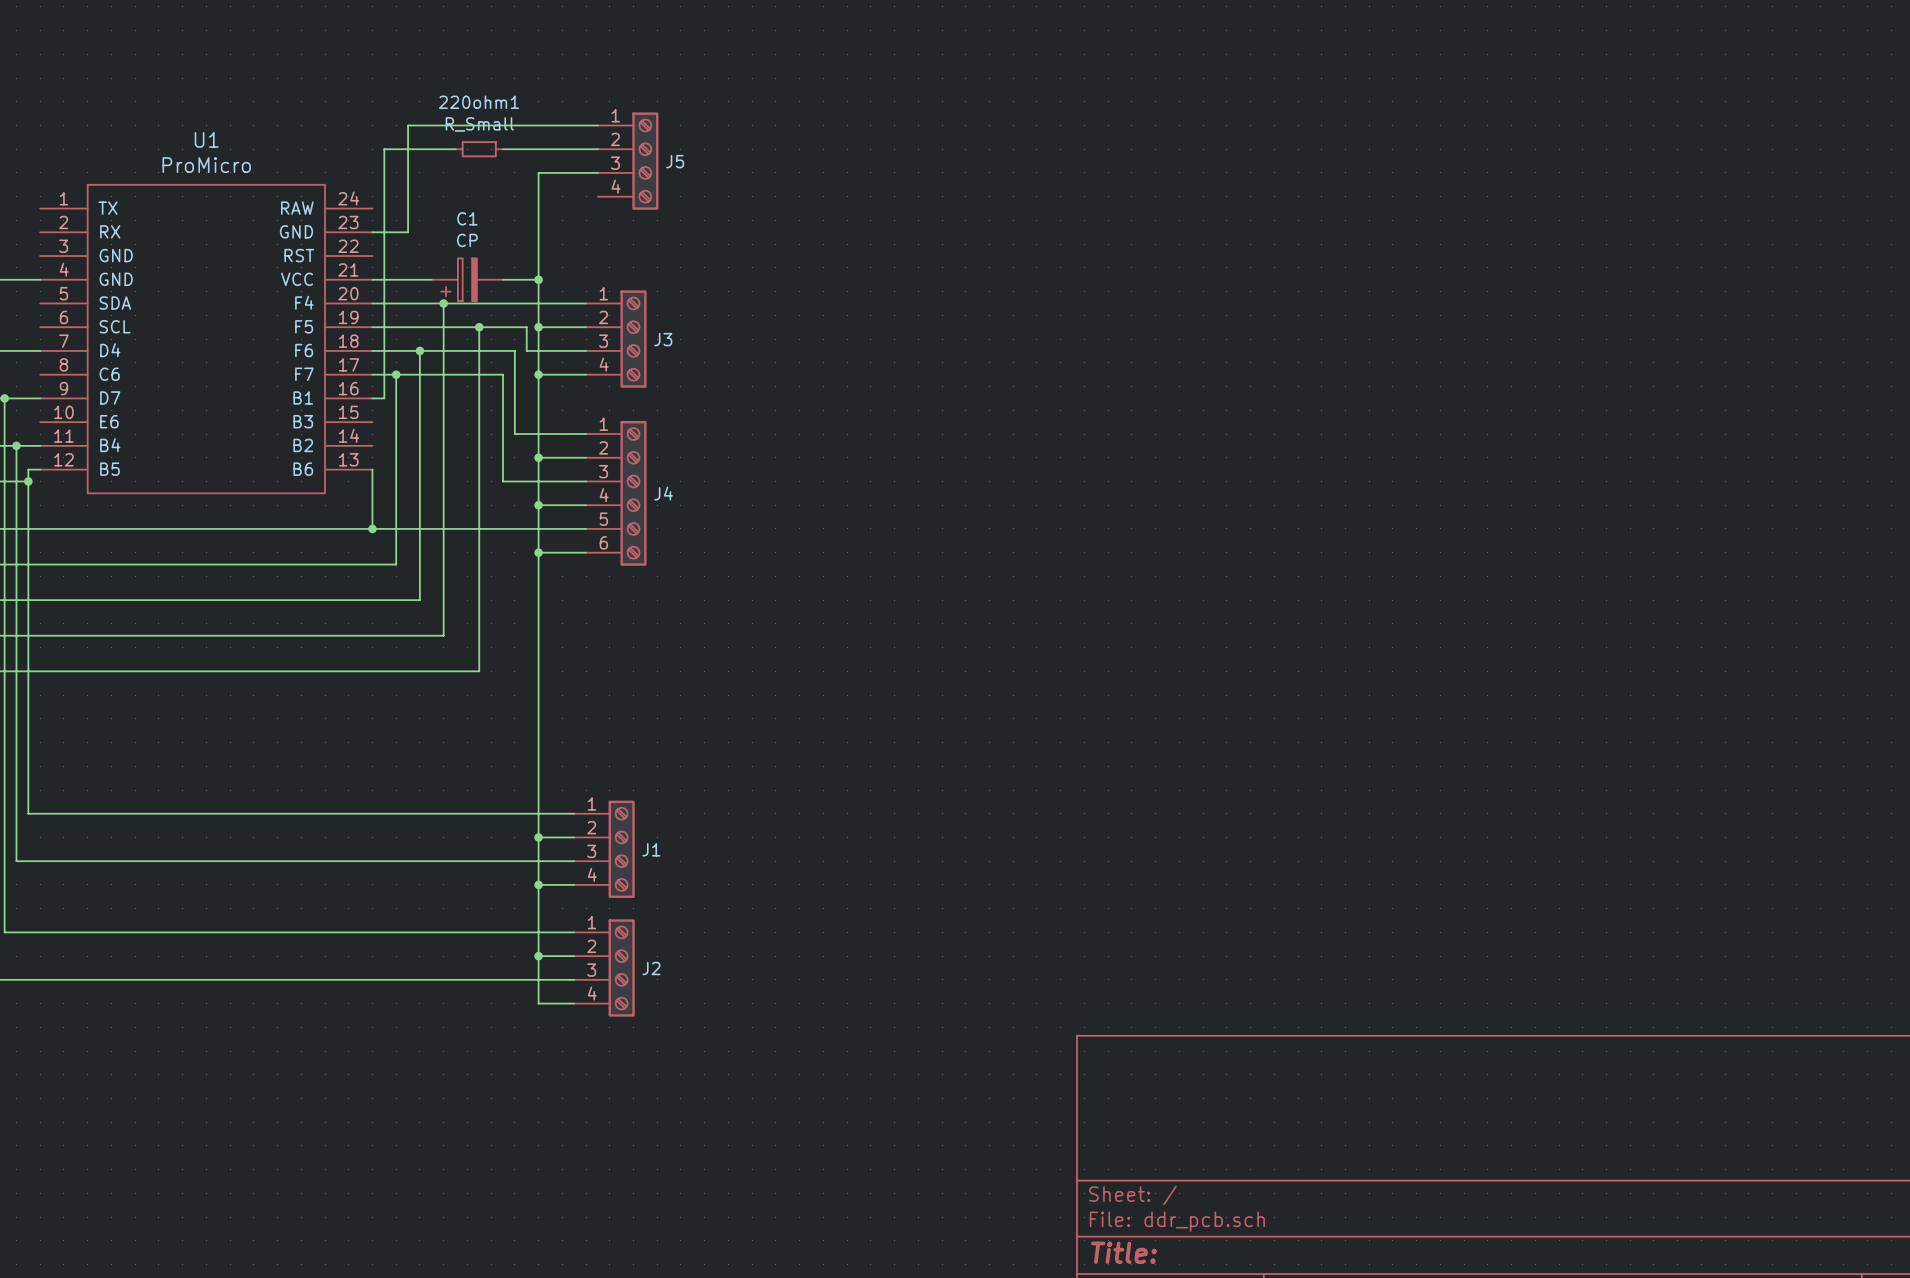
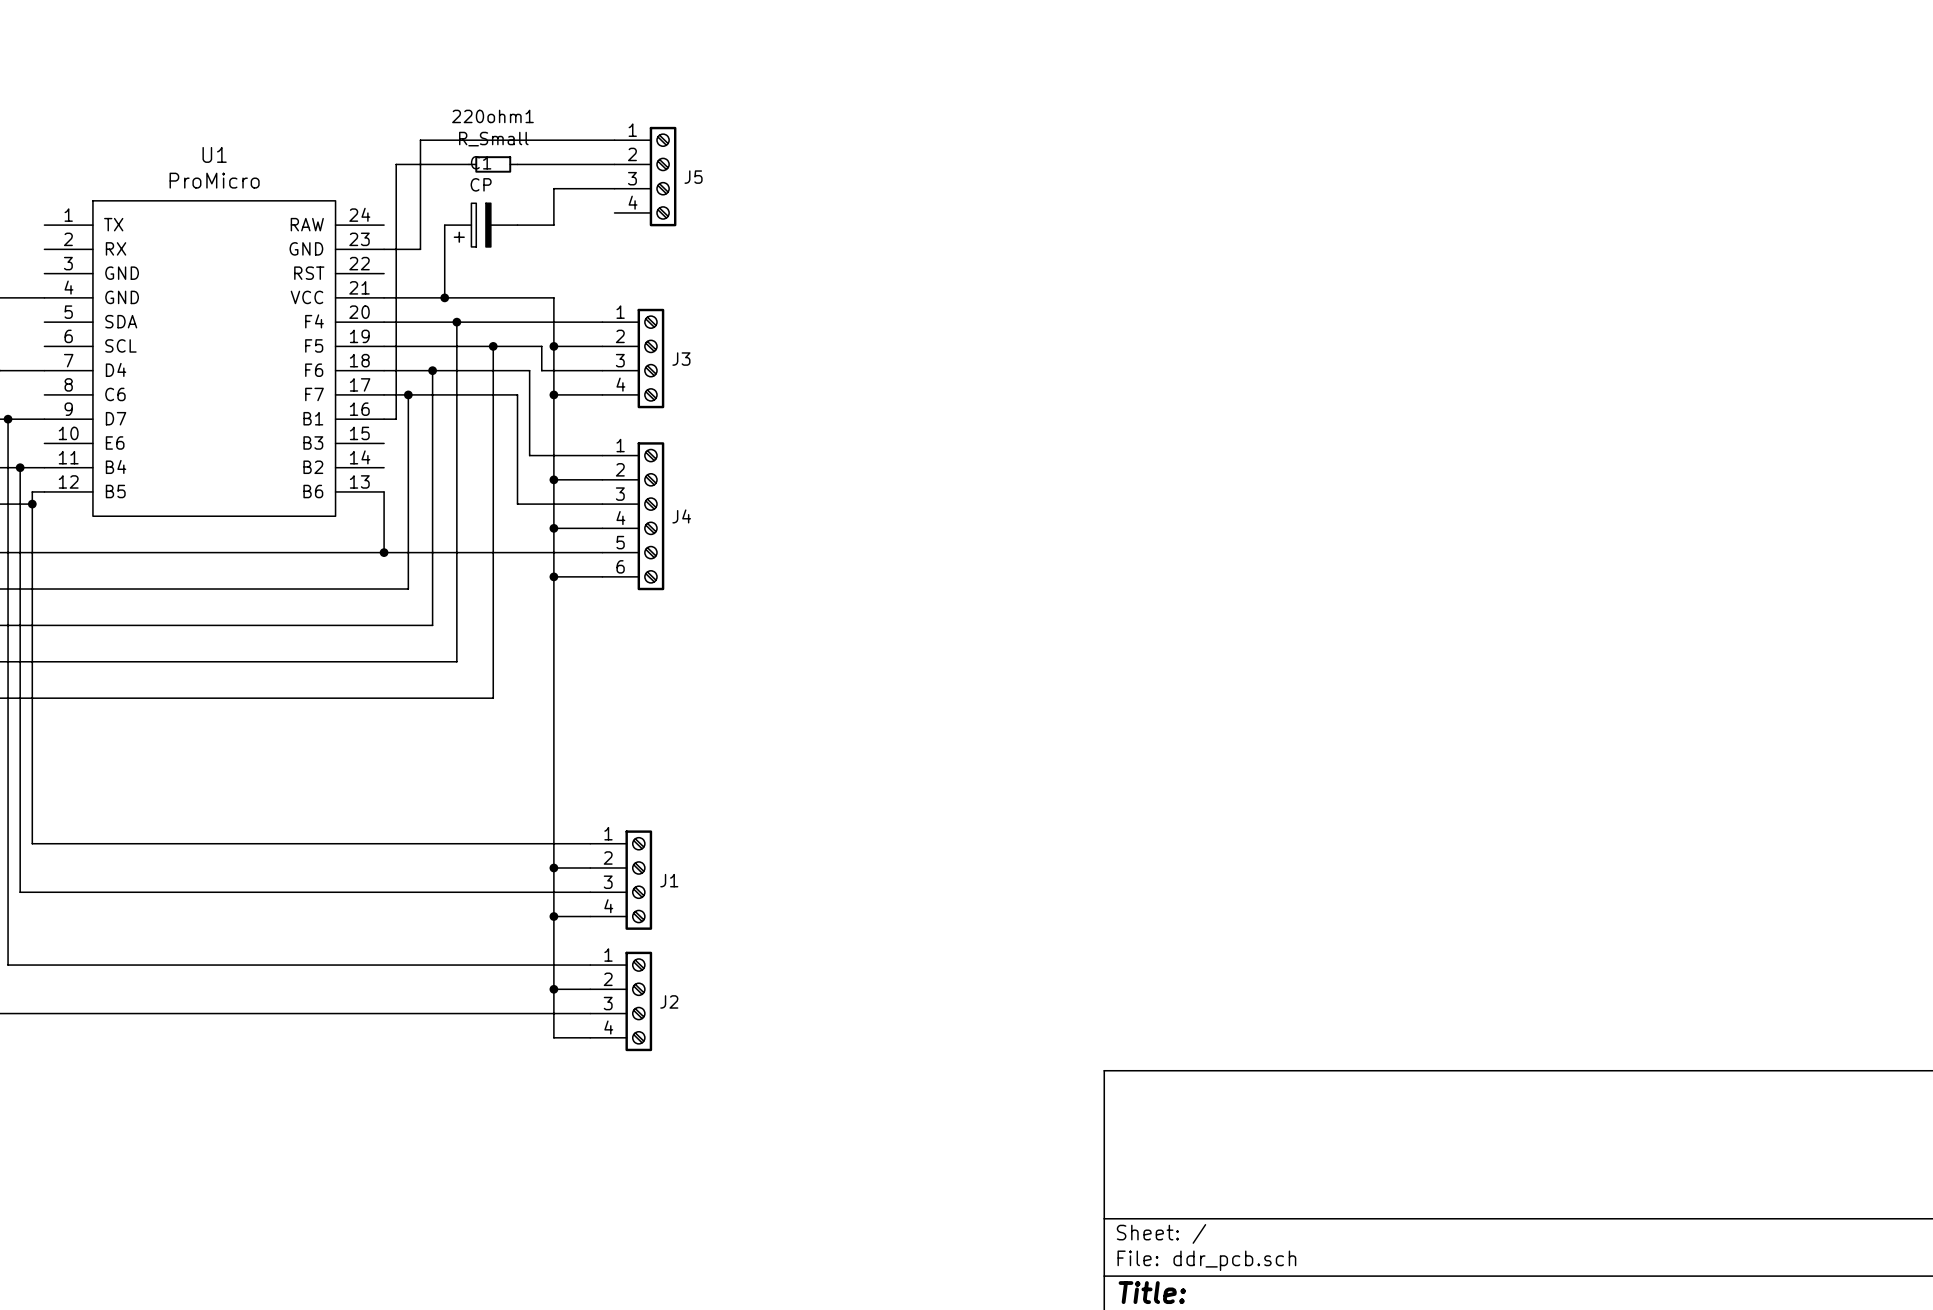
wire: none -> (444, 225) (444, 297) (517, 297)
wire: (538, 208) (538, 279) -> (553, 225) (517, 225)
junction: none -> (444, 297)
C1 position: (467, 279) -> (481, 225)
junction: (538, 279) -> none

